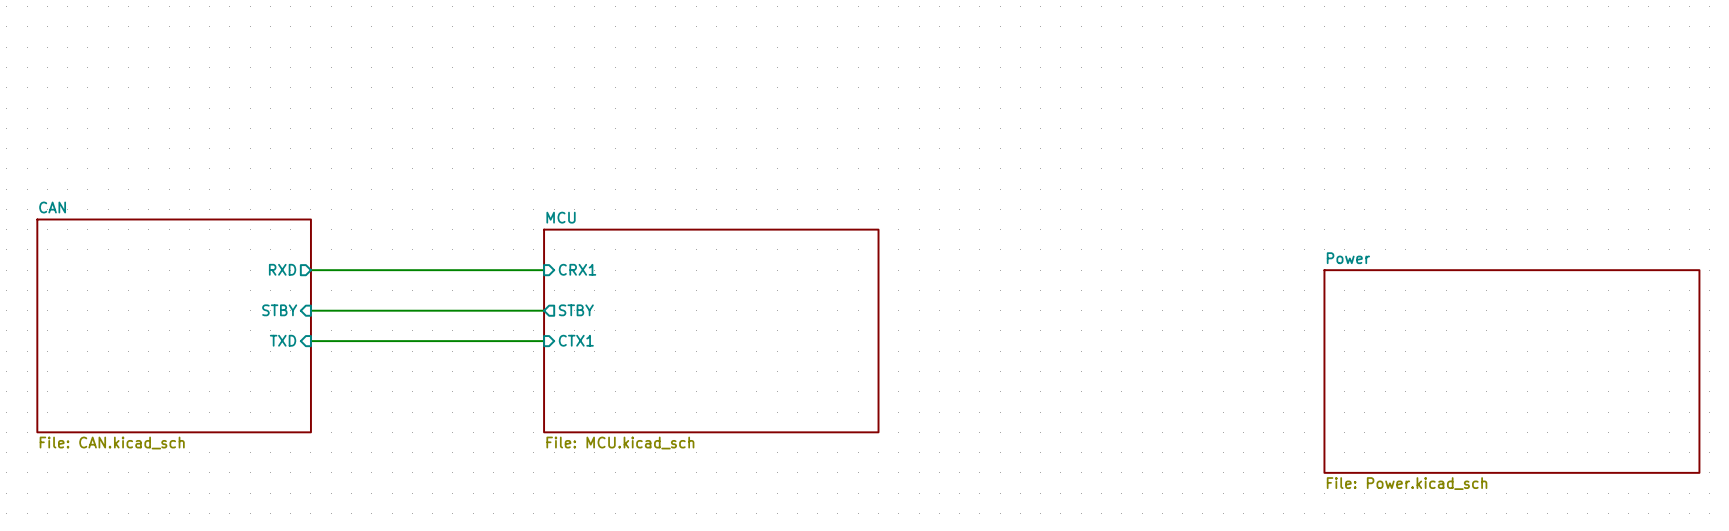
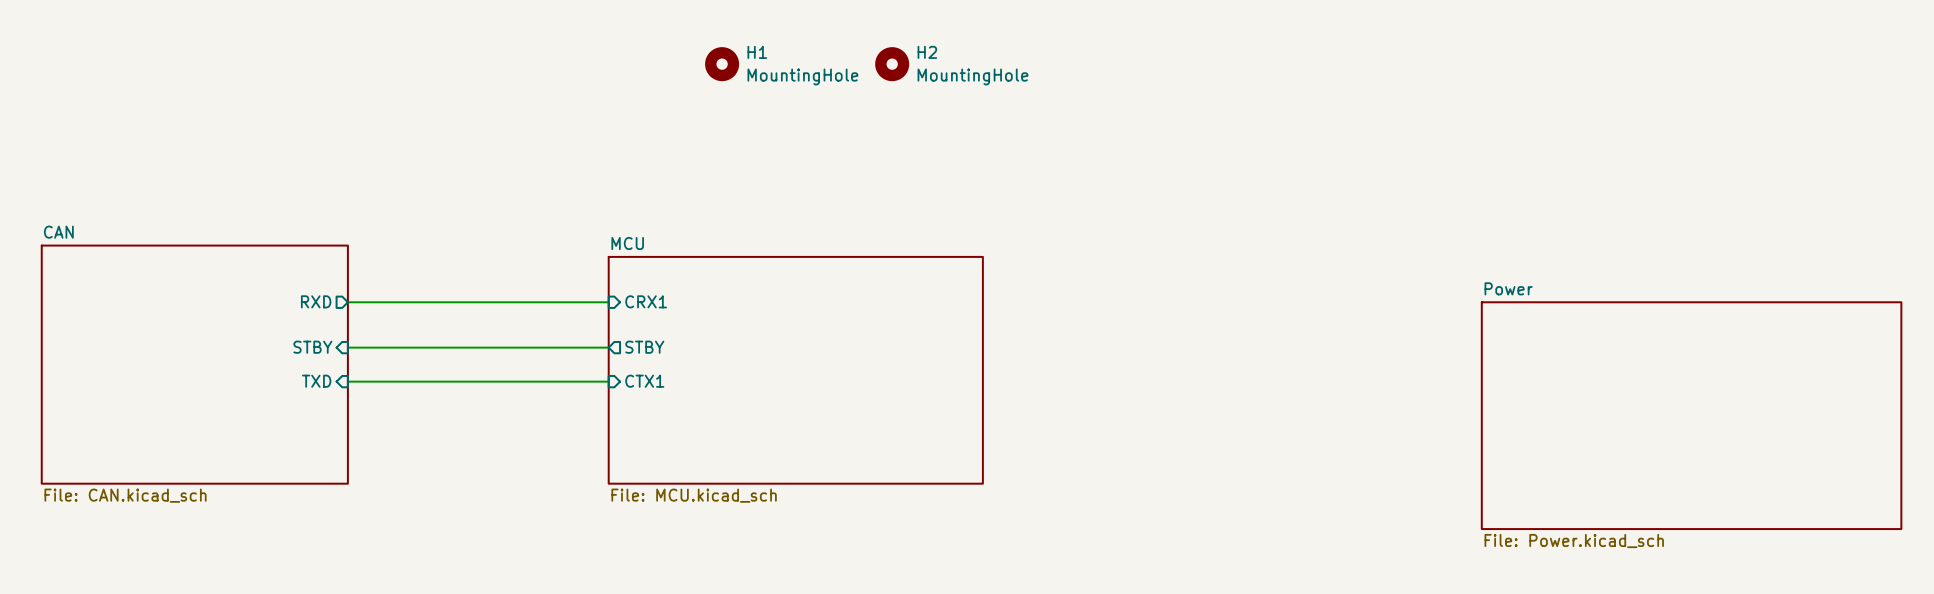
H1: none -> MountingHole (722, 64)
H2: none -> MountingHole (892, 64)

